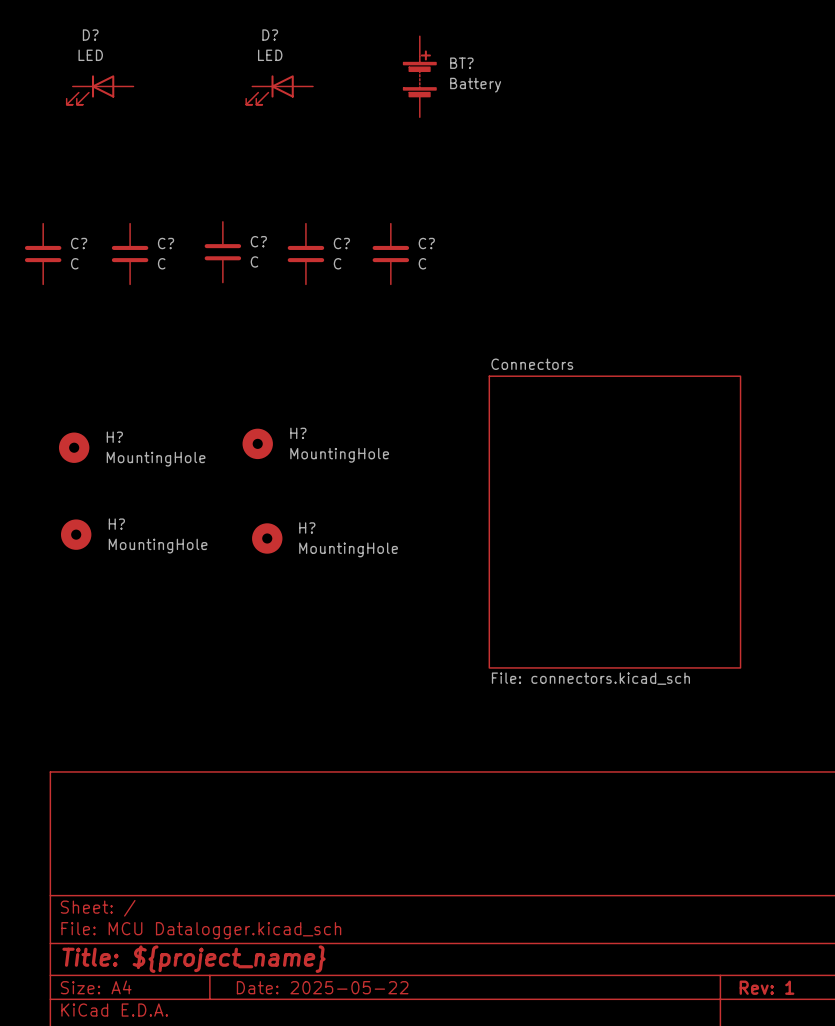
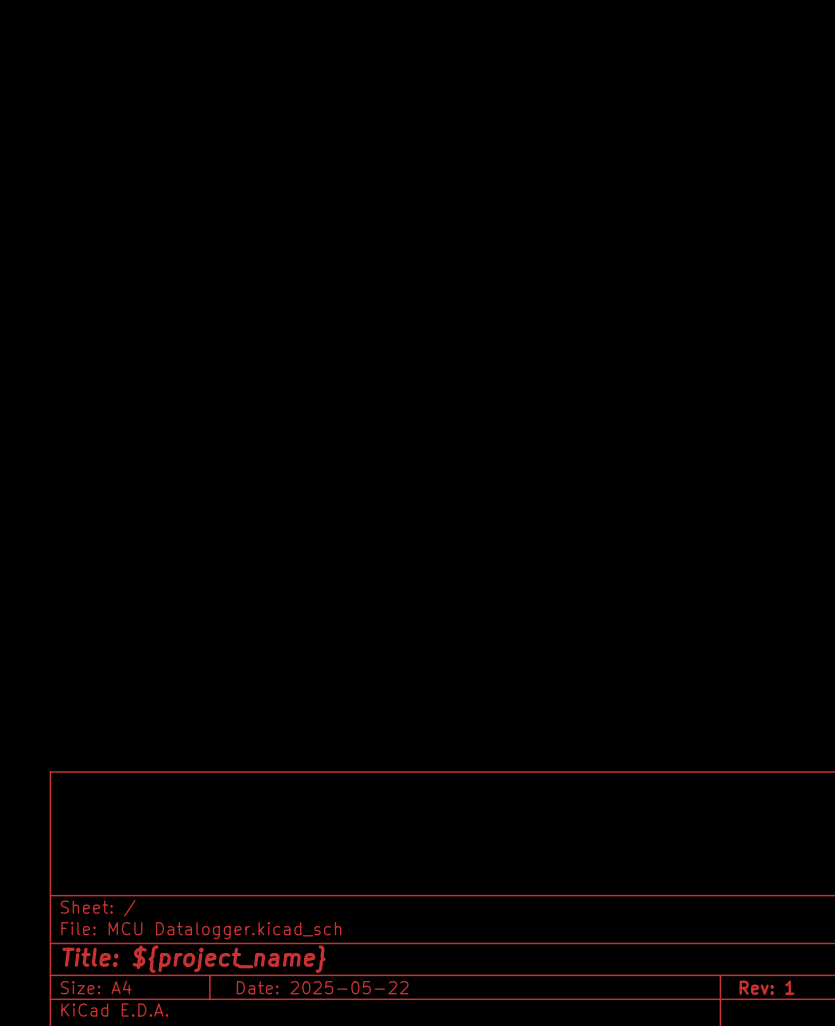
BT?: Battery (419, 76) -> none
D?: LED (100, 90) -> none
D?: LED (279, 90) -> none
C?: C (222, 252) -> none
C?: C (43, 254) -> none
C?: C (130, 254) -> none
C?: C (305, 254) -> none
C?: C (390, 254) -> none
H?: MountingHole (257, 443) -> none
H?: MountingHole (74, 447) -> none
sheet Connectors: File: connectors.kicad_sch (614, 522) -> none
H?: MountingHole (76, 534) -> none
H?: MountingHole (267, 538) -> none

